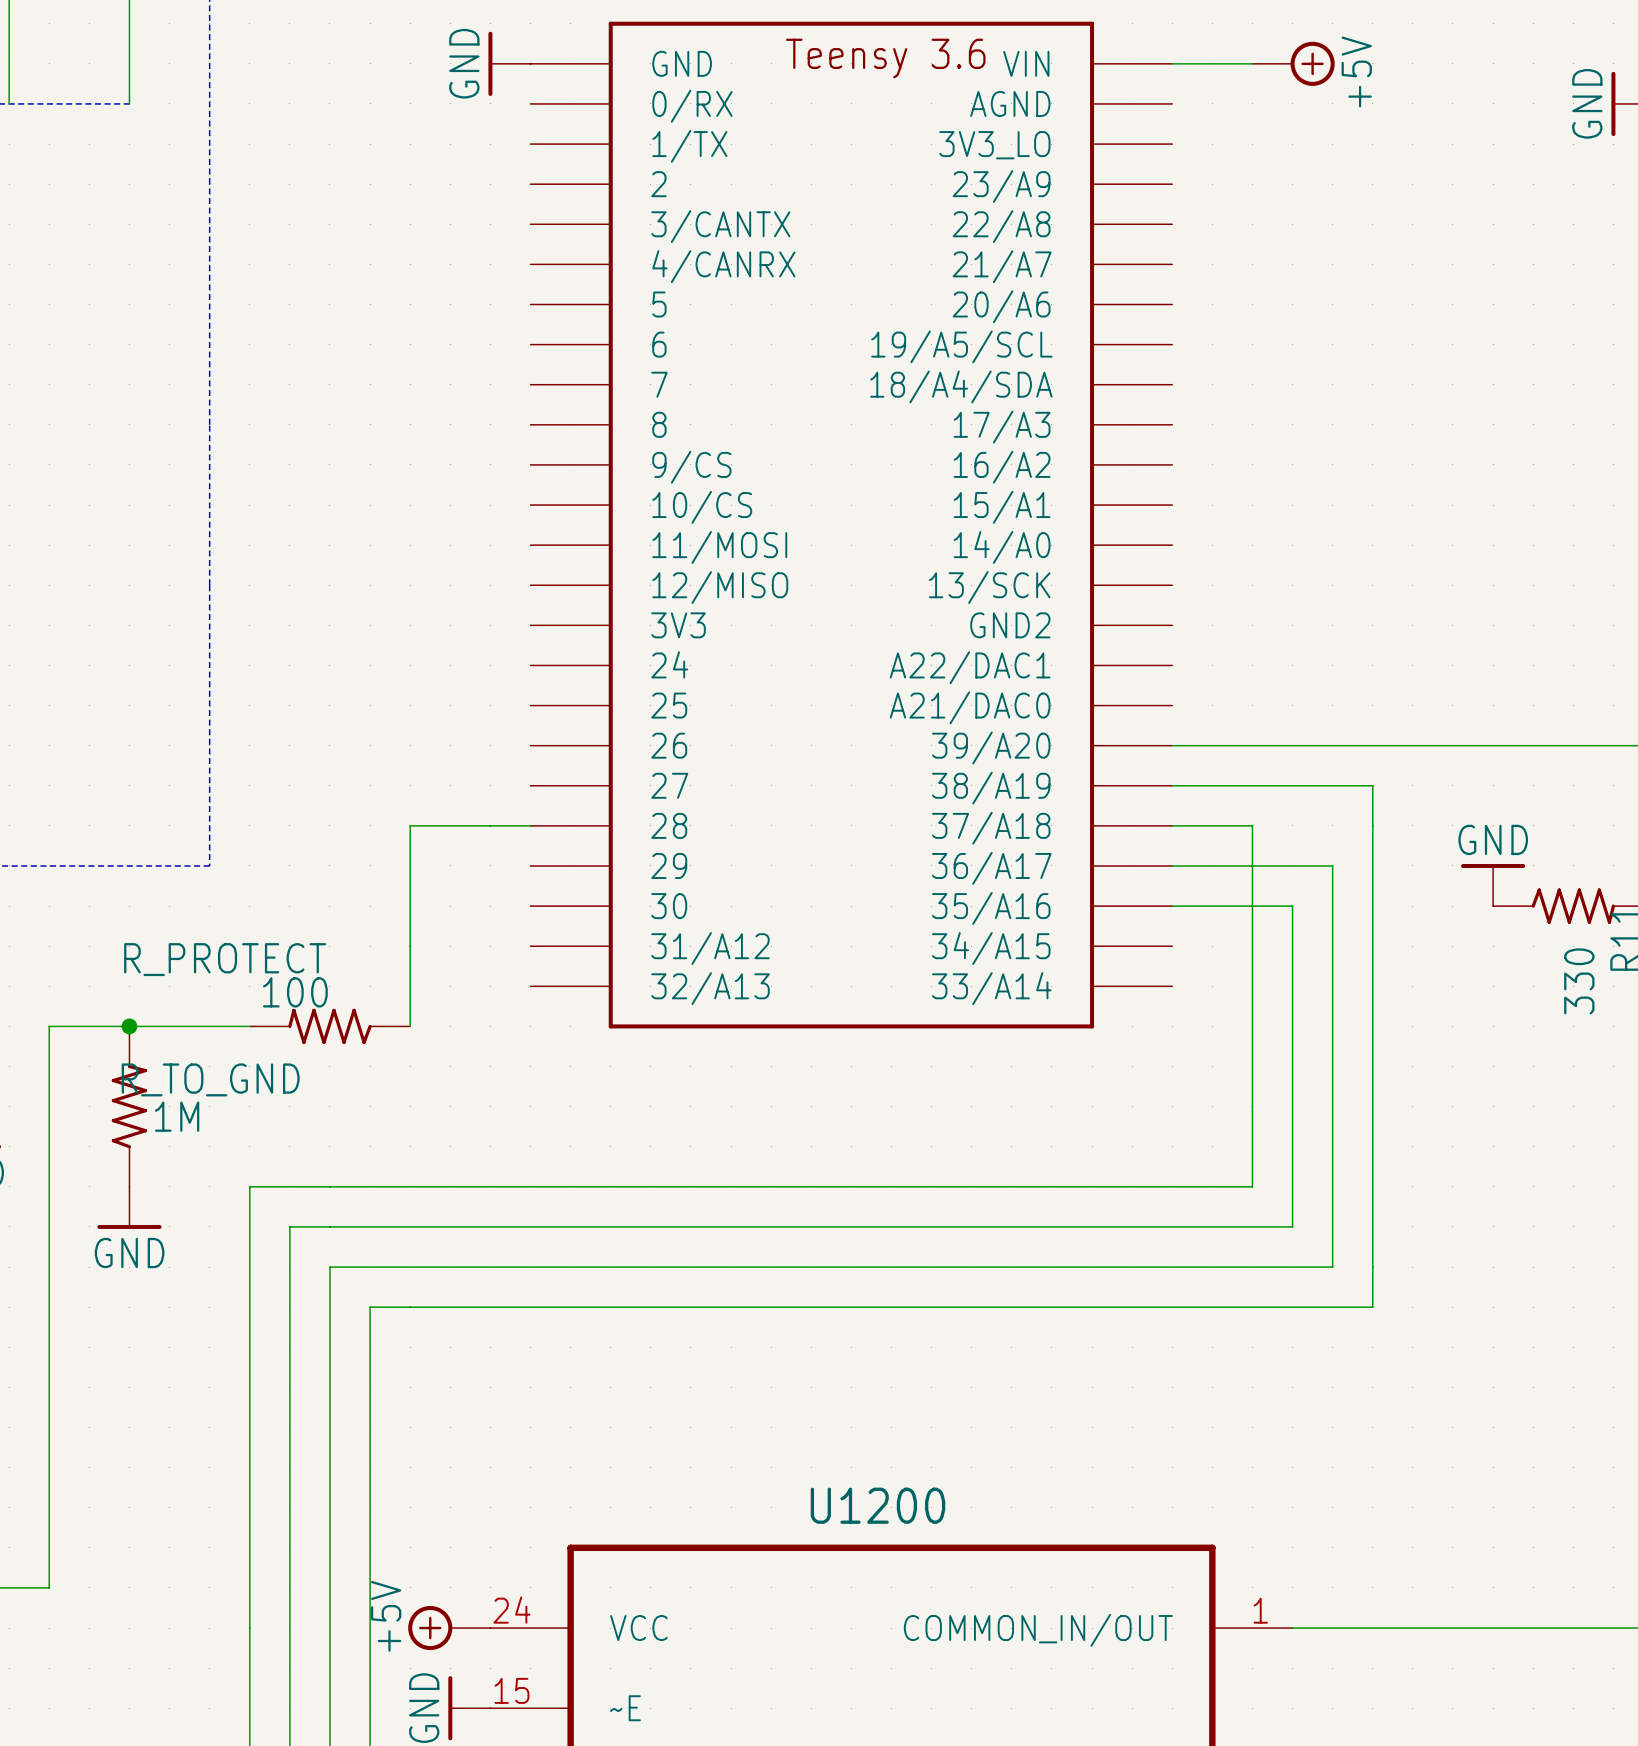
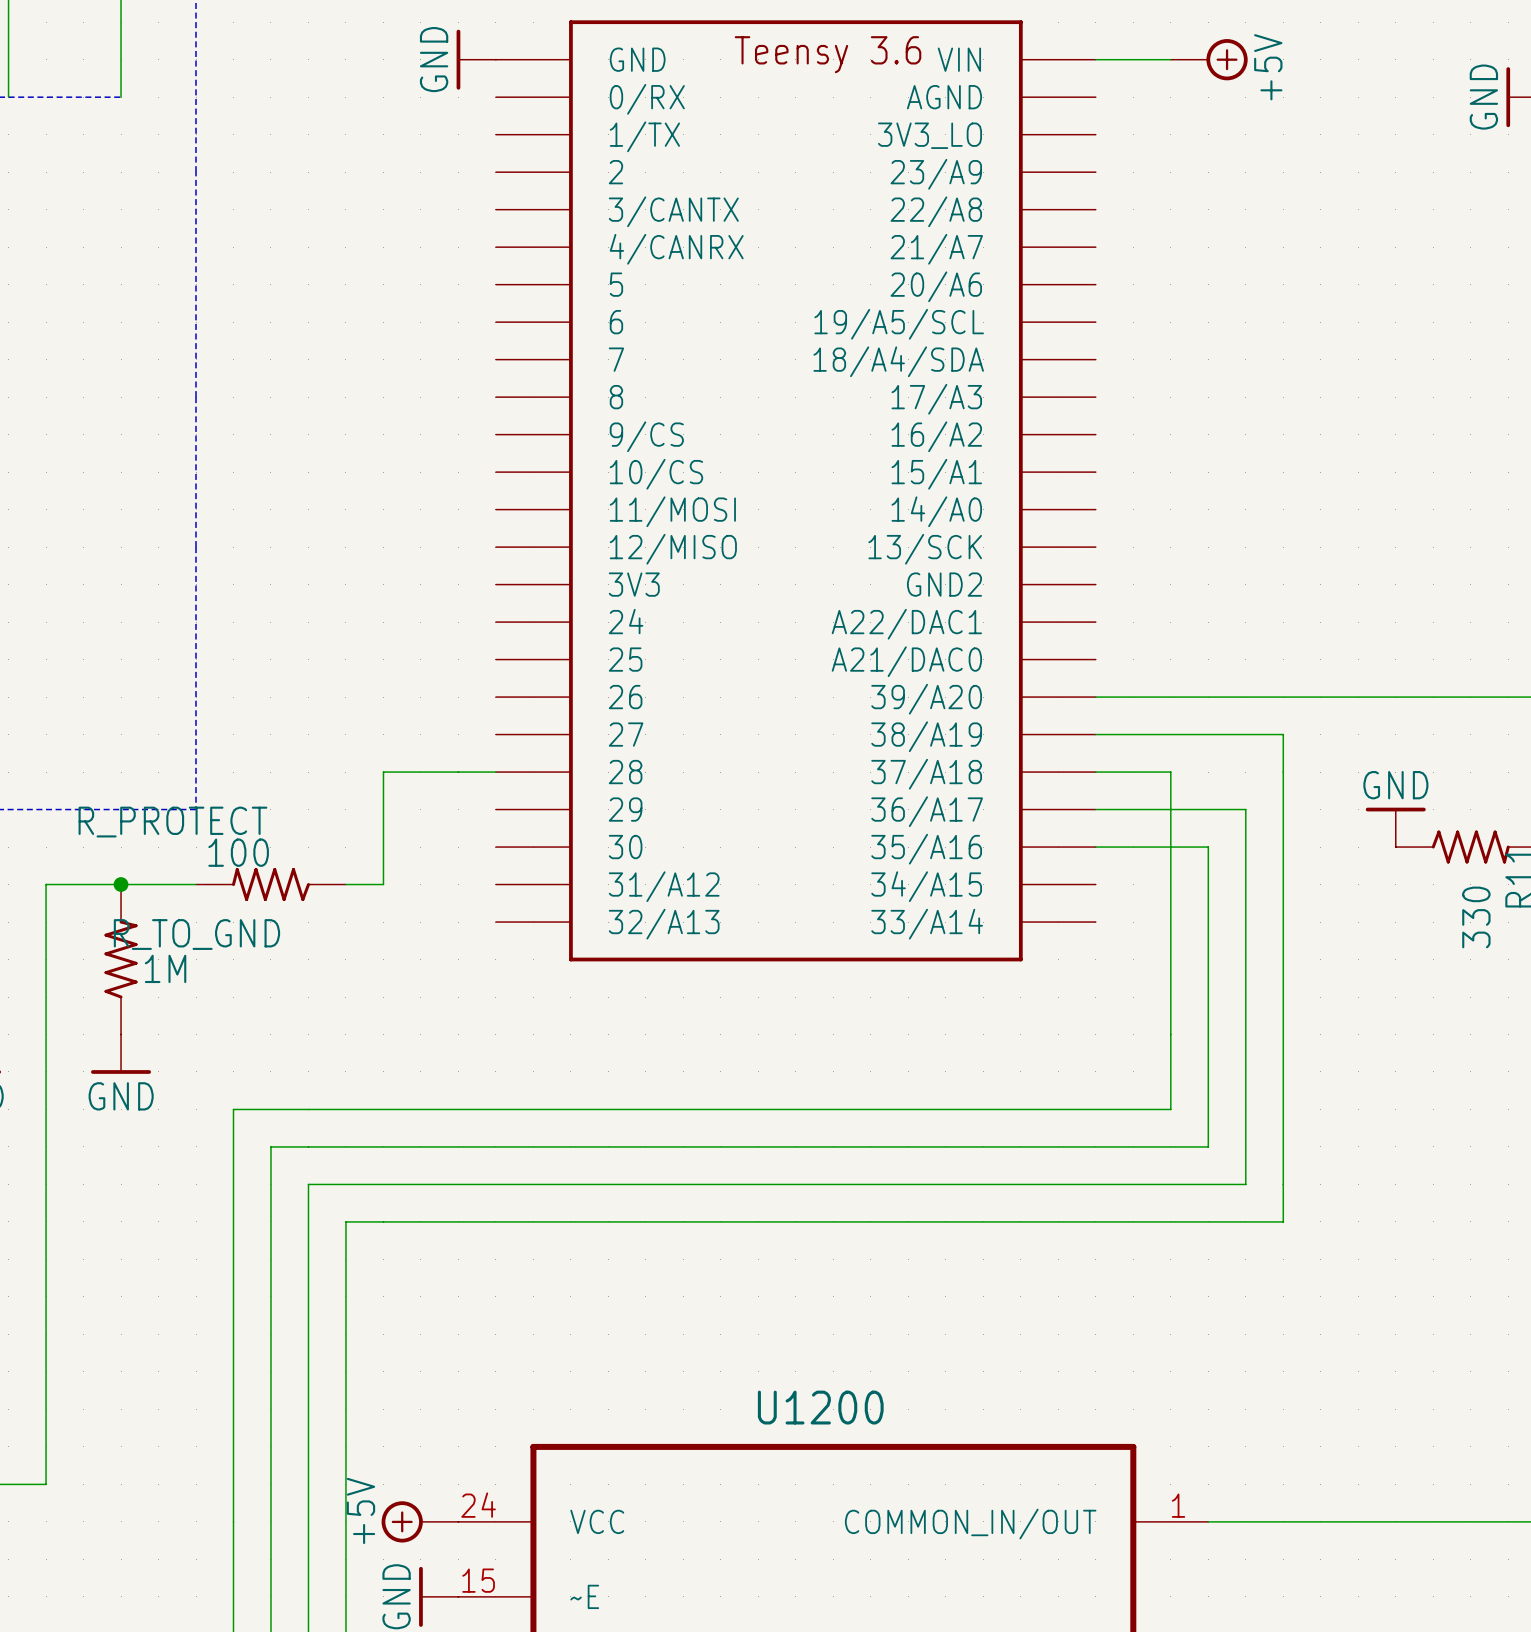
wire: (410, 946) (410, 1026) -> (383, 884) (345, 884)
wire: (49, 1026) (249, 1026) -> (46, 959) (46, 884) (196, 884)
junction position: (129, 1026) -> (121, 884)
R_PROTECT position: (329, 1026) -> (270, 884)
R_TO_GND position: (129, 1106) -> (121, 959)
power symbol position: GND (129, 1207) -> GND (121, 1054)

